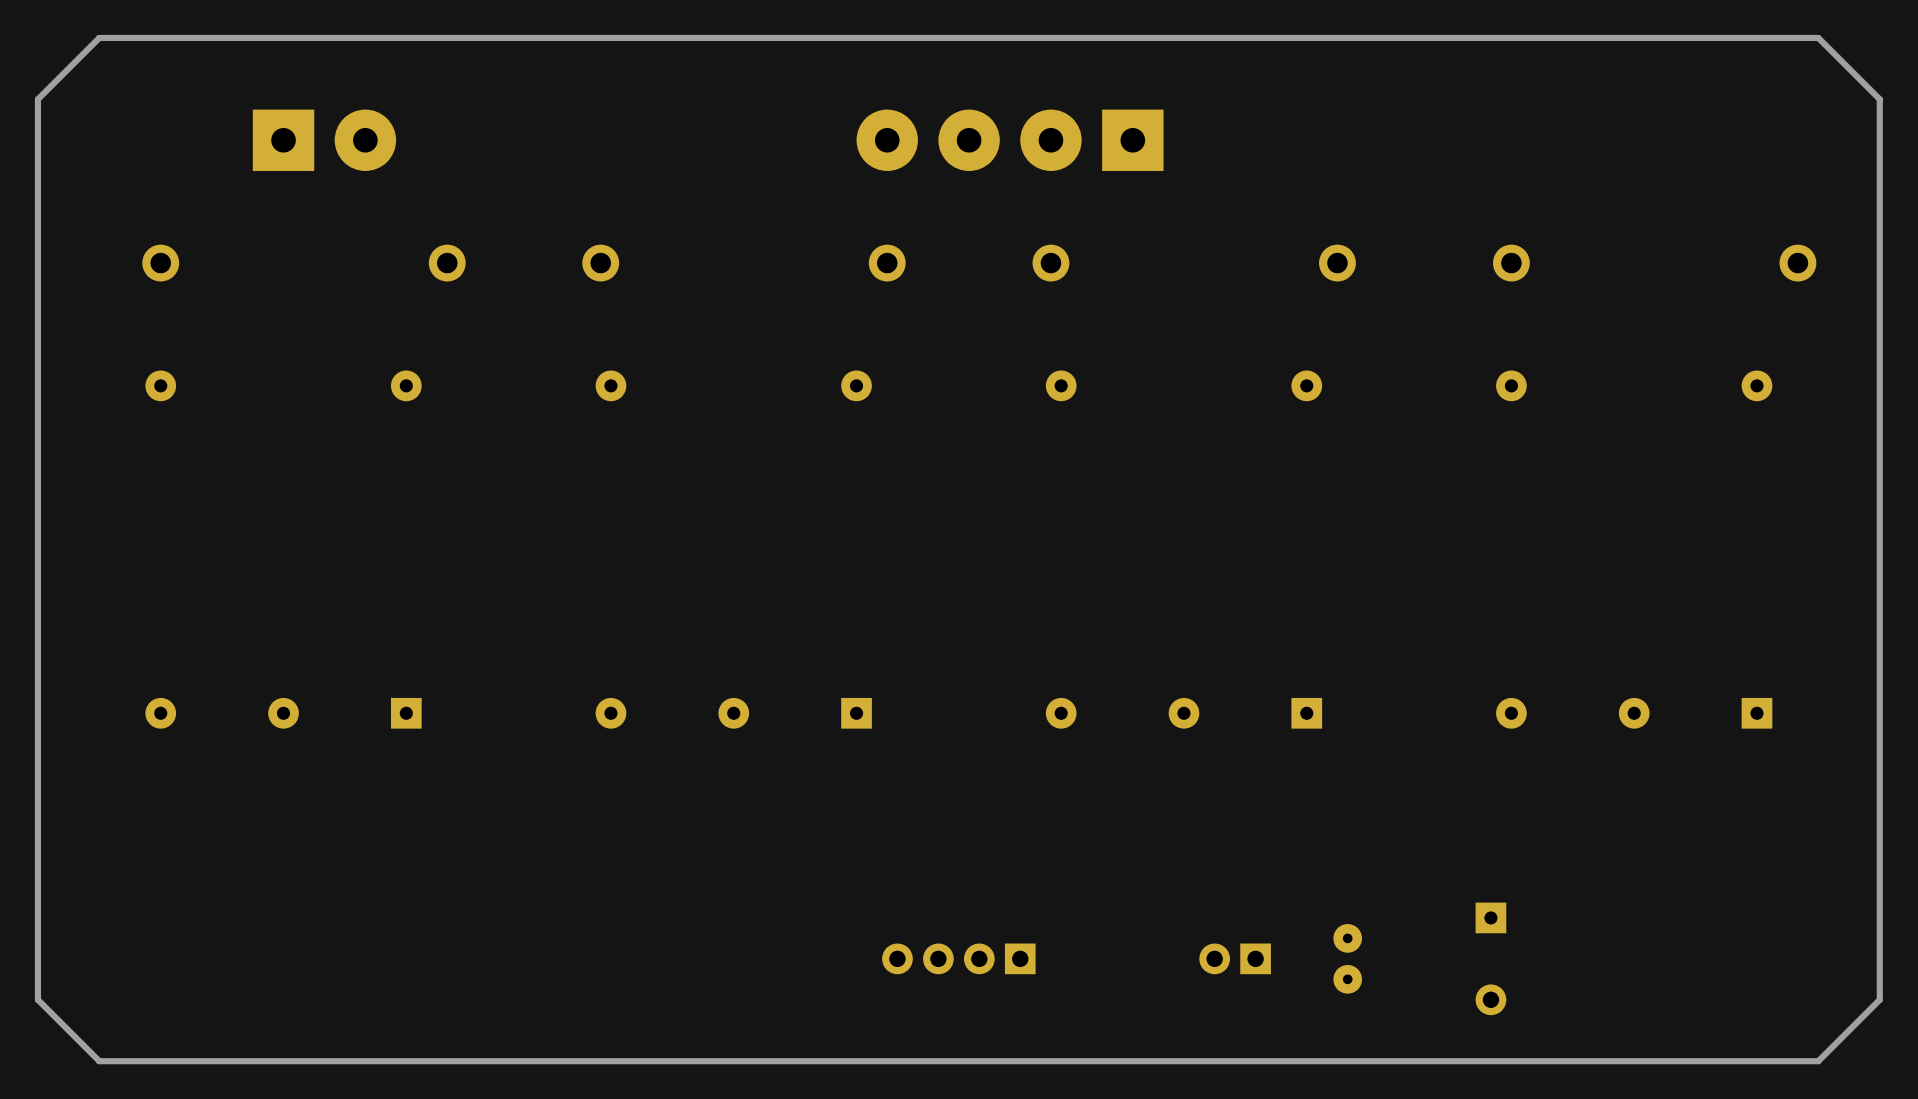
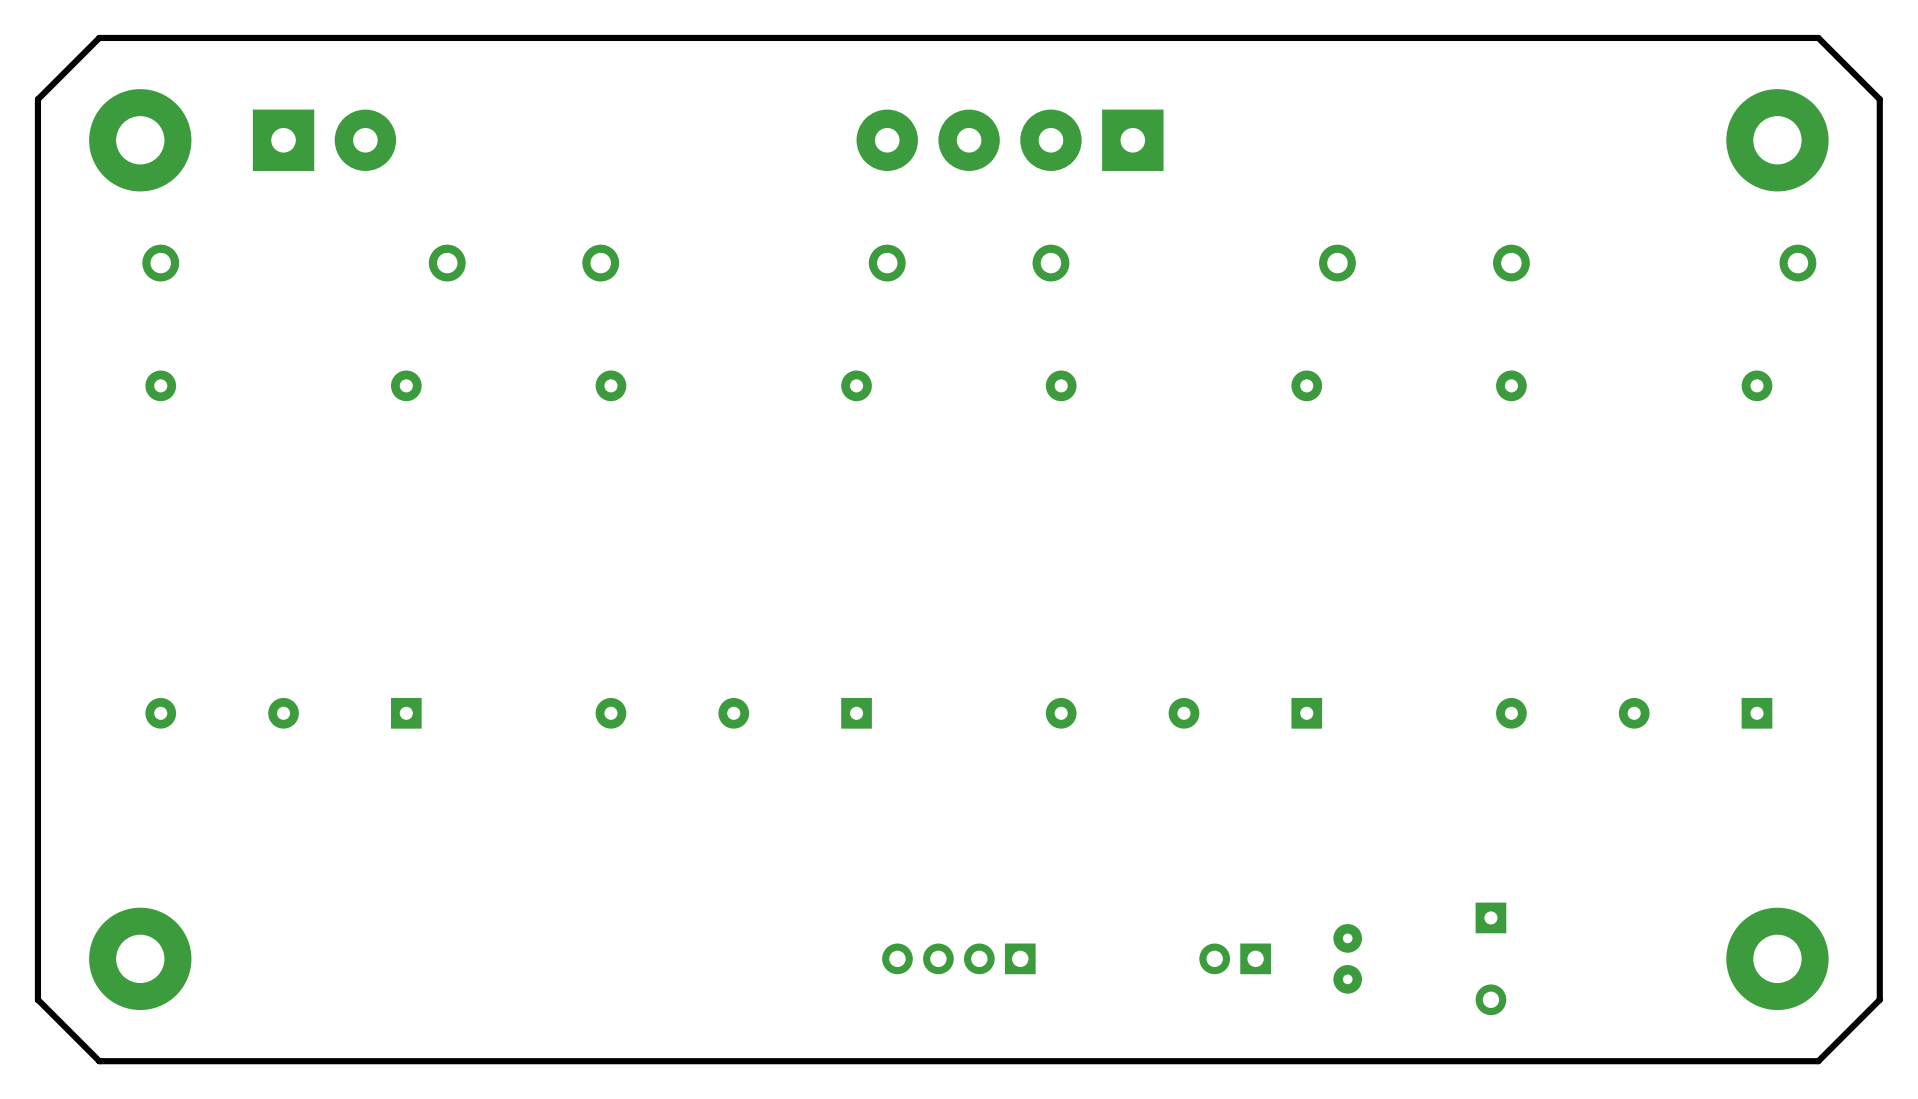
part: none -> (140, 140)
part: none -> (1777, 140)
part: none -> (140, 958)
part: none -> (1777, 958)

